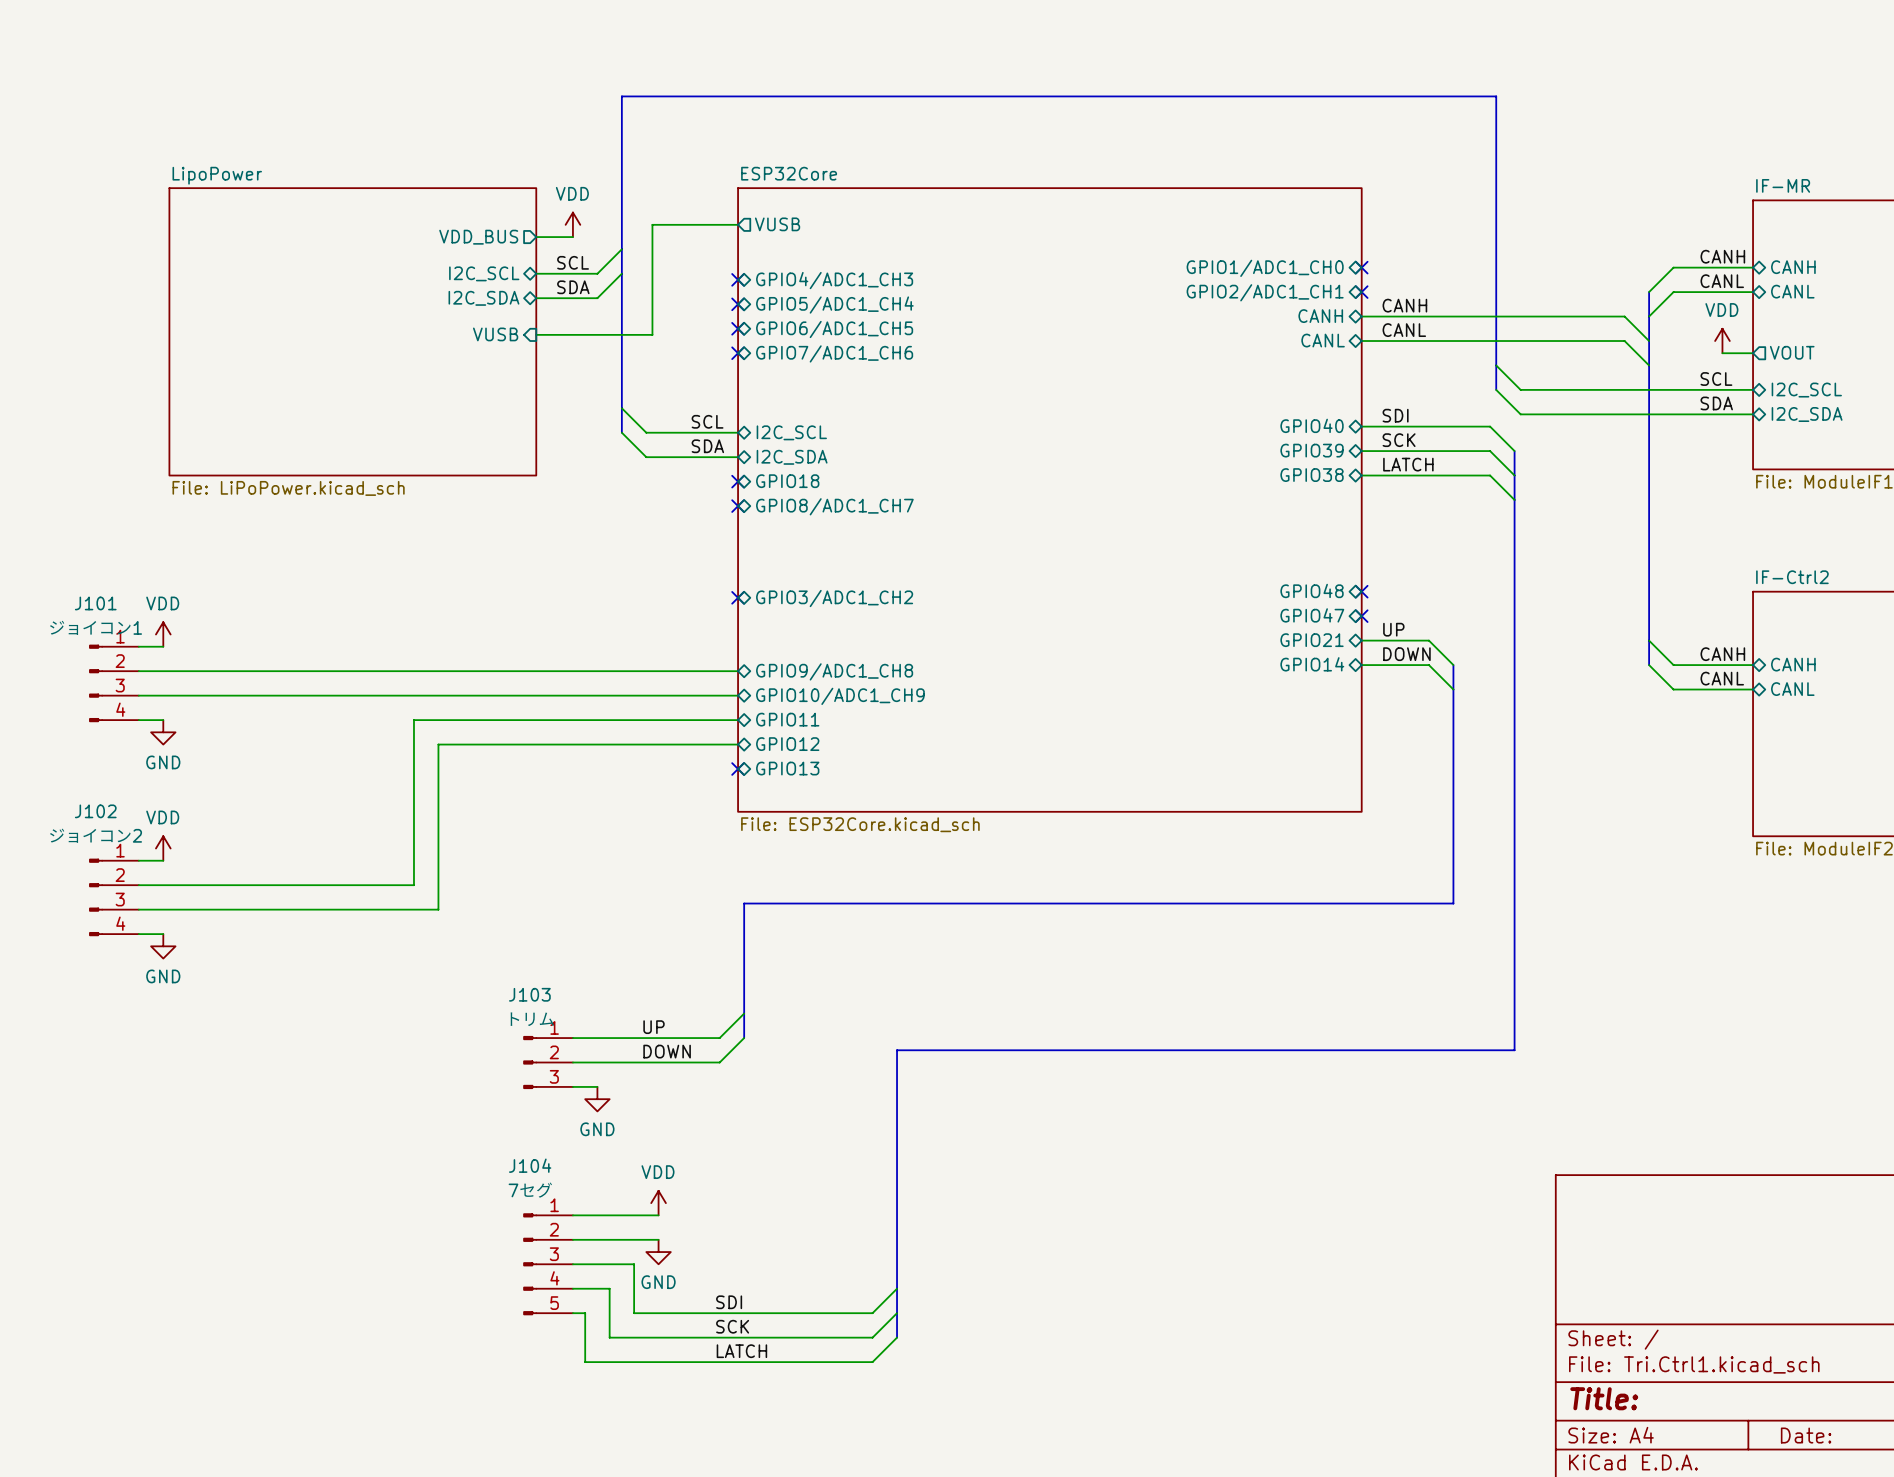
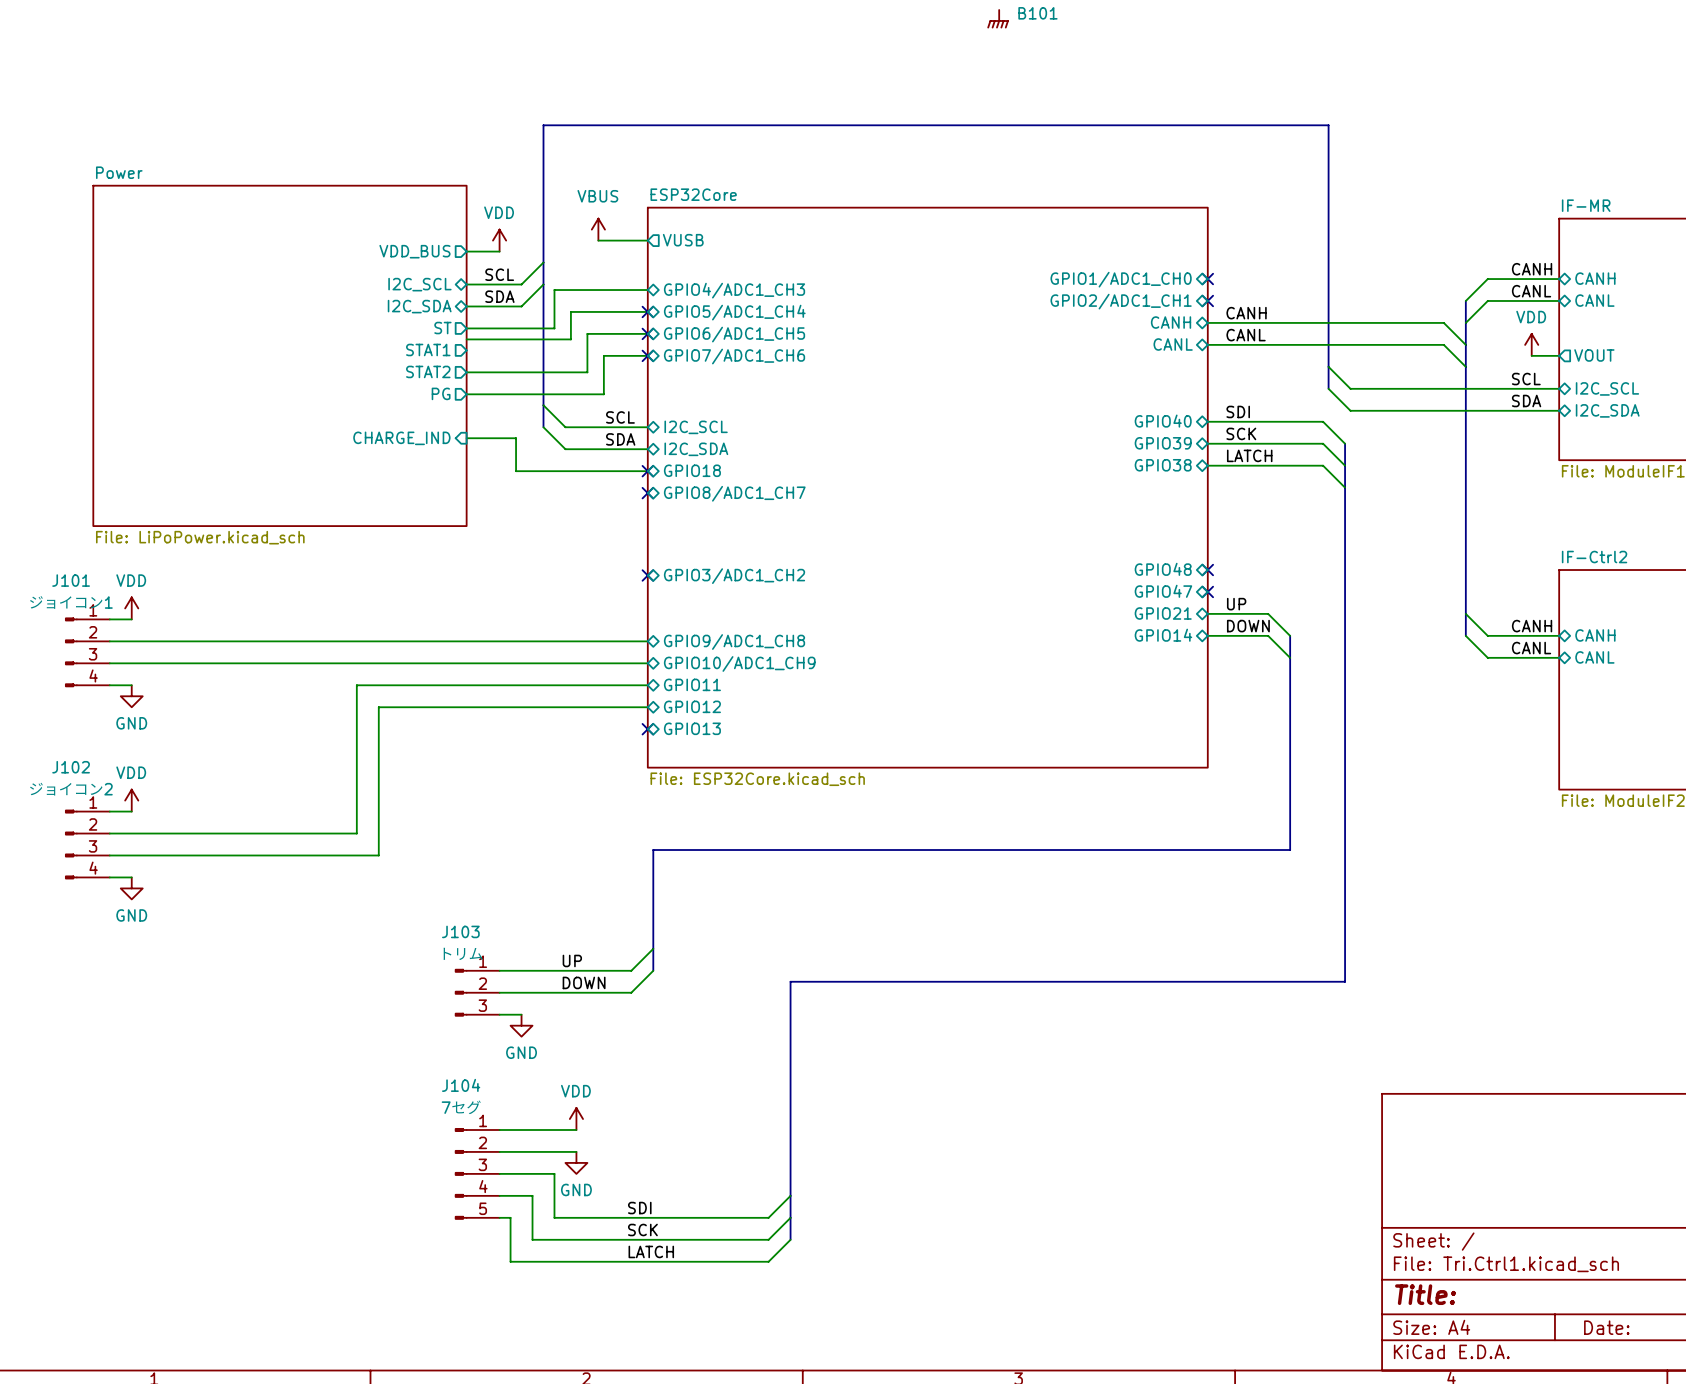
power symbol: none -> VBUS (598, 229)
wire: (683, 224) (652, 224) (652, 304) -> (647, 311) (570, 311)
wire: none -> (647, 290) (554, 290) (554, 328) (466, 328)
no-connect mark: (738, 279) -> none
sheet pin: none -> ST (442, 328)
wire: none -> (647, 333) (587, 333) (587, 372) (466, 372)
sheet LipoPower: File: LiPoPower.kicad_sch (352, 331) -> none
sheet pin: VUSB (495, 334) -> none
sheet pin: none -> STAT1 (428, 349)
sheet Power: none -> File: LiPoPower.kicad_sch (279, 355)
wire: none -> (647, 355) (603, 355) (603, 394) (466, 394)
sheet pin: none -> STAT2 (428, 371)
sheet pin: none -> PG (441, 393)
wire: none -> (466, 438) (516, 438) (516, 471) (647, 471)
sheet pin: none -> CHARGE_IND (401, 438)

